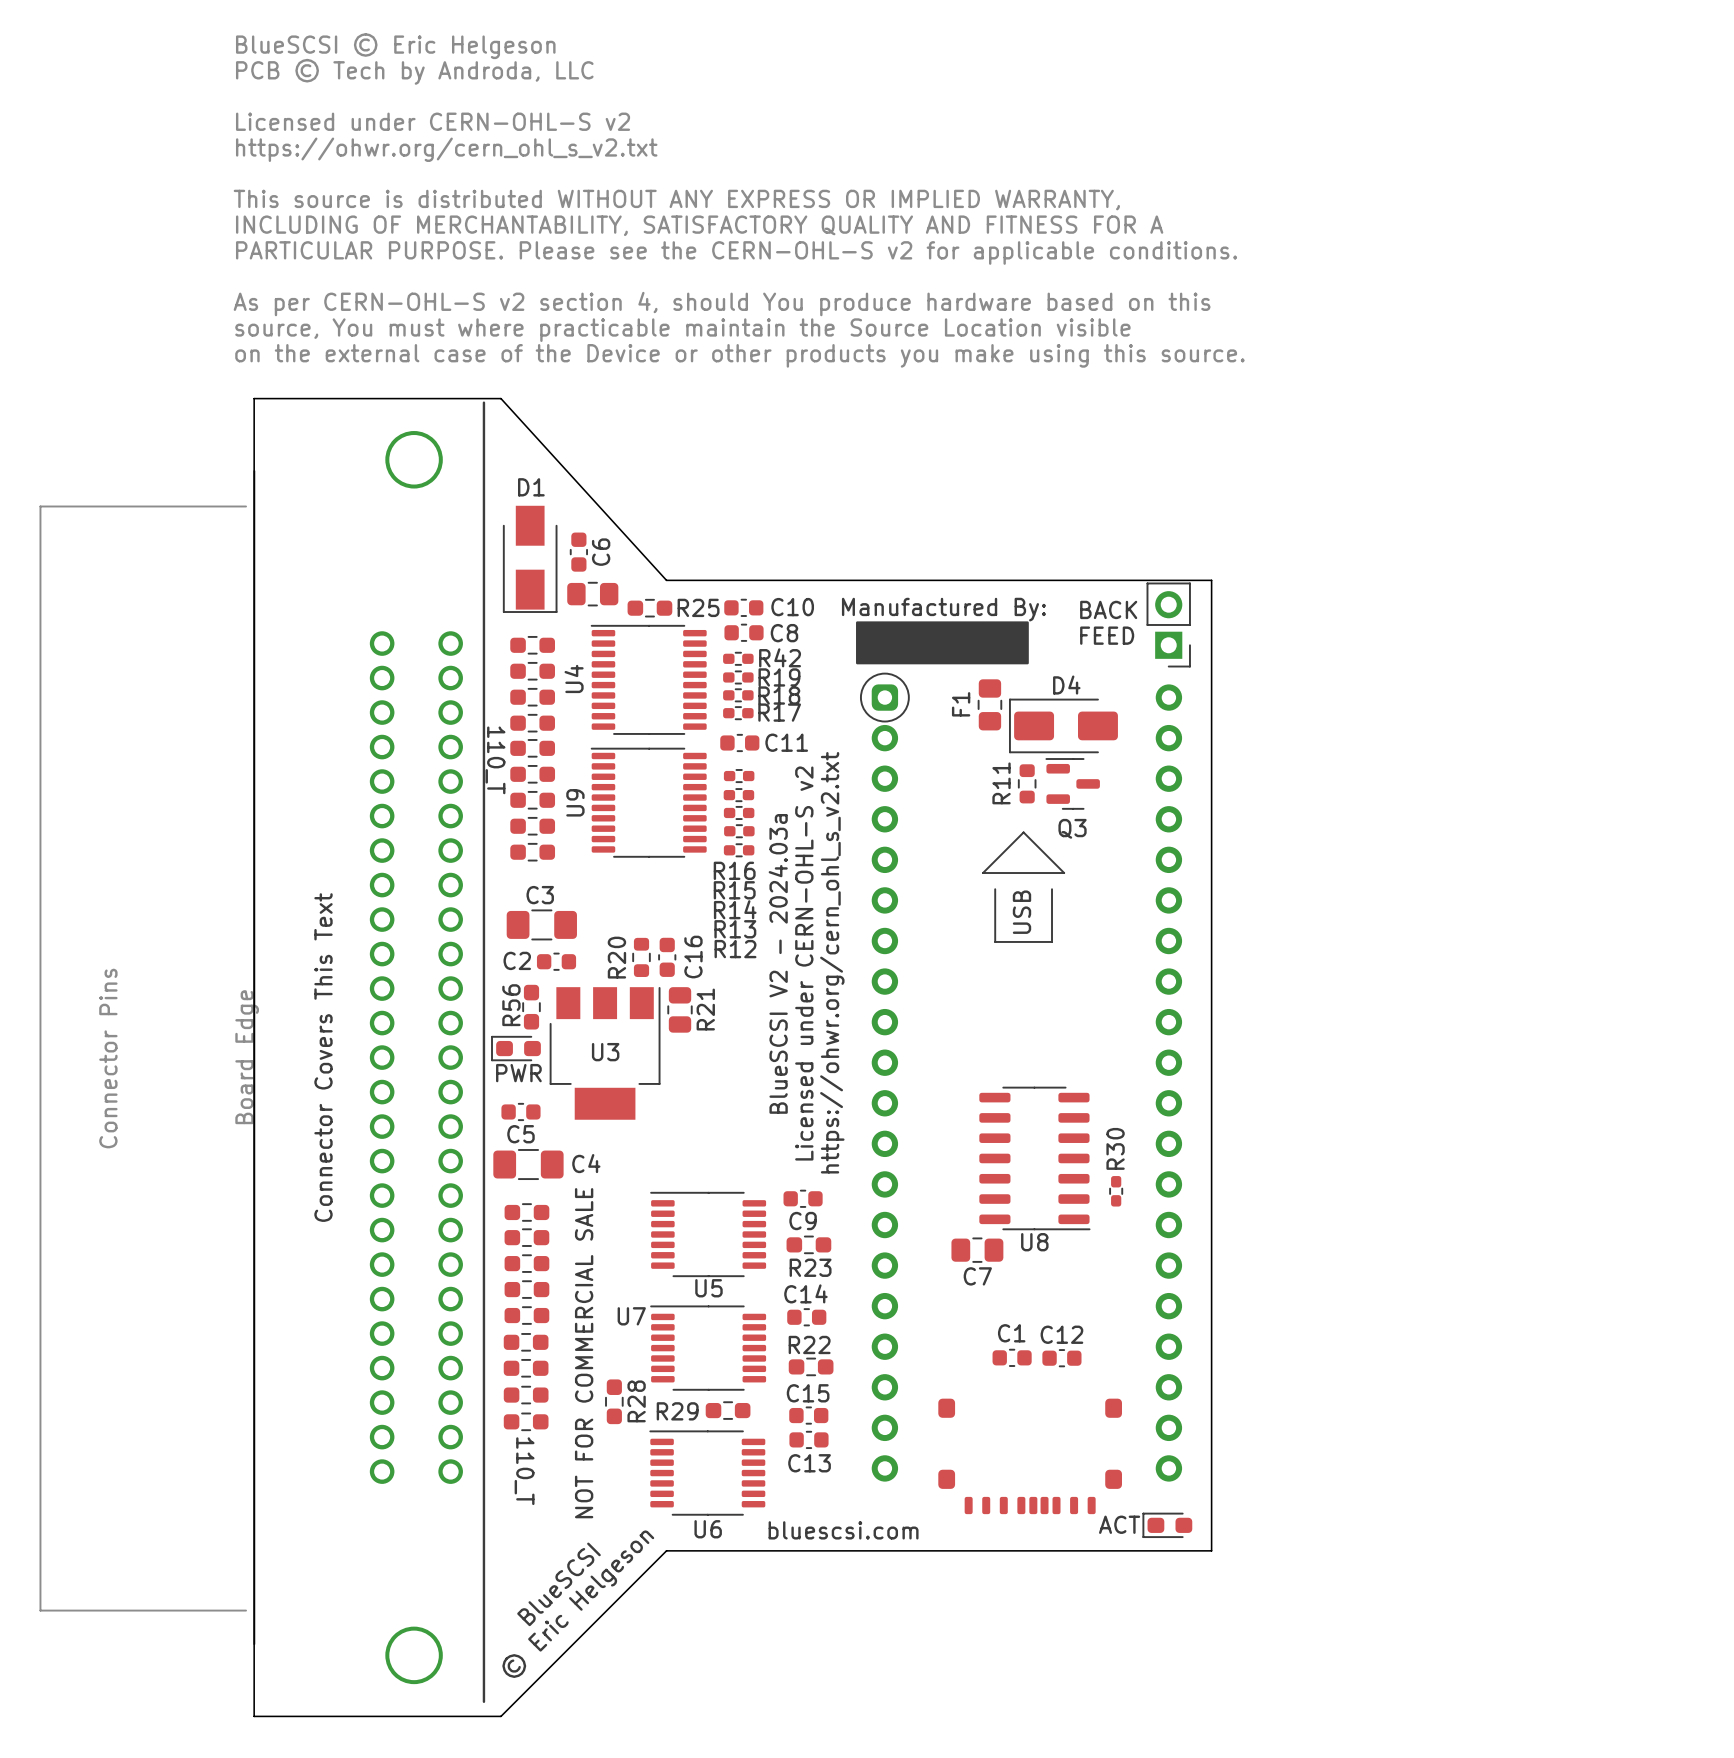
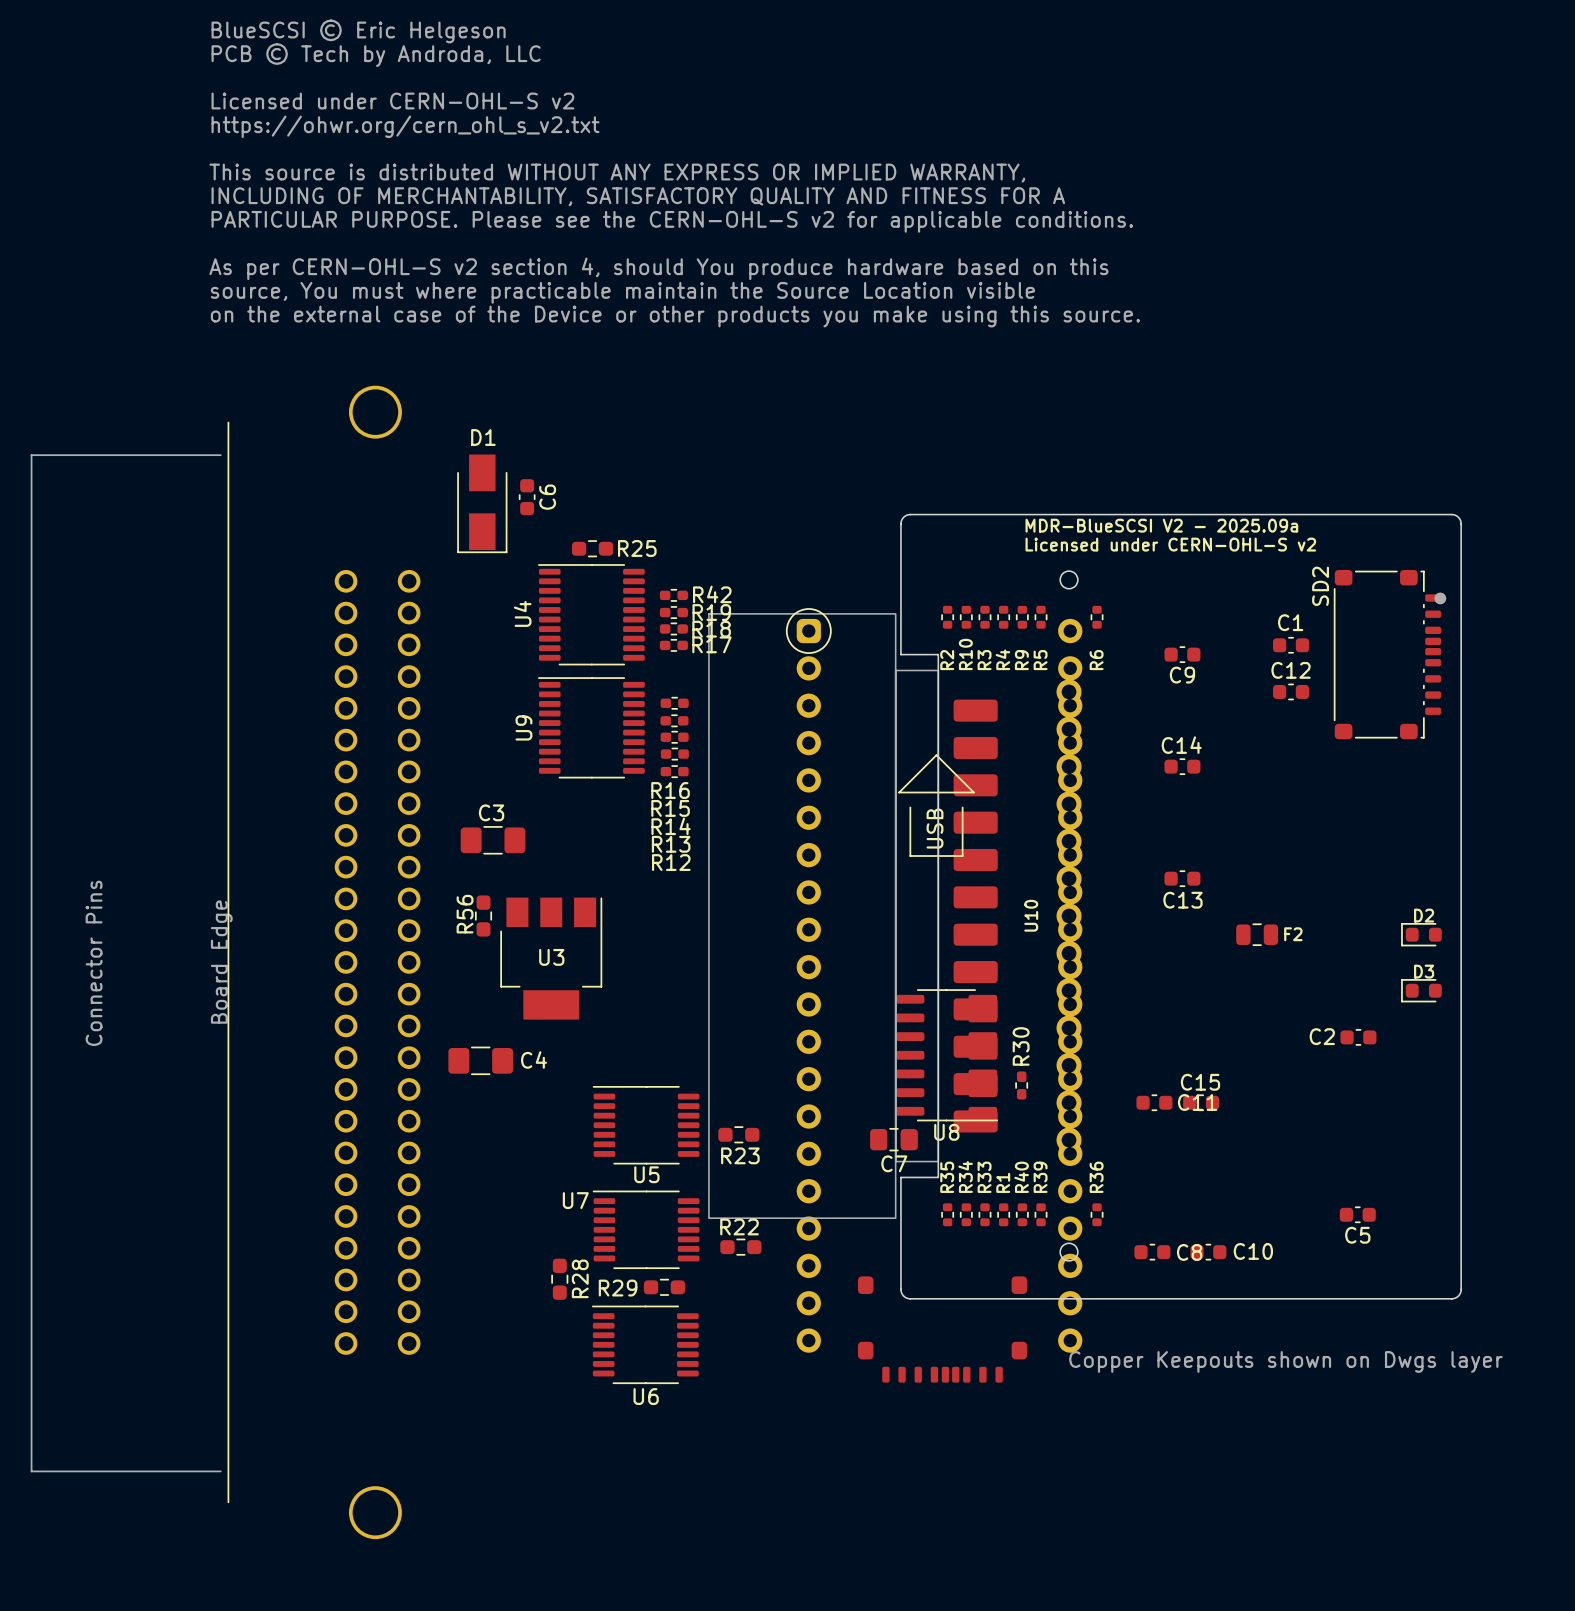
board edge: (254, 398) (254, 1716) (500, 1716) (666, 1550) (1211, 1550) (1211, 580) (666, 580) (500, 398) (254, 398) -> none
line: (483, 402) (483, 1701) -> none
board edge: none -> (910, 514) (1451, 514) (1459, 518) (1461, 1289) (1456, 1297) (910, 1298) (902, 1294) (900, 1177) (938, 1177) (938, 654) (900, 654) (901, 522) (904, 516) (910, 514)
text: none -> MDR-BlueSCSI V2 - 2025.09a (1161, 525)
part: (592, 594) -> none
text: none -> Licensed under CERN-OHL-S v2 (1170, 544)
C10 position: (743, 607) -> (1208, 1252)
text: Manufactured By: (943, 609) -> none
text: BACK (1108, 609) -> none
drawing: [856, 621, 1029, 665] -> none
part: (1168, 624) -> none
round board edge: none -> [1059, 570, 1079, 590]
C8 position: (744, 632) -> (1152, 1252)
text: FEED (1107, 635) -> none
part: (532, 645) -> none
part: (532, 671) -> none
R2: none -> (947, 617)
R10: none -> (966, 617)
R3: none -> (984, 617)
R4: none -> (1003, 617)
R9: none -> (1022, 617)
R5: none -> (1041, 617)
R6: none -> (1097, 617)
part: (532, 697) -> none
F1: (989, 704) -> none
part: (532, 723) -> none
SD2: none -> (1389, 654)
D4: (1063, 725) -> none
C11 position: (739, 742) -> (1154, 1102)
part: (532, 748) -> none
text: 110_T (495, 760) -> none
part: (532, 774) -> none
R11: (1027, 783) -> none
Q3: (1072, 783) -> none
part: (532, 800) -> none
part: (532, 826) -> none
part: (532, 852) -> none
R20: (641, 957) -> none
C16: (667, 957) -> none
C2 position: (556, 961) -> (1358, 1037)
text: https://ohwr.org/cern_ohl_s_v2.txt (832, 962) -> none
text: BlueSCSI V2 - 2024.03a (778, 963) -> none
text: Licensed under CERN-OHL-S v2 (804, 963) -> none
U10: none -> (894, 916)
R21: (680, 1009) -> none
F2: none -> (1257, 934)
D2: none -> (1421, 934)
part: (515, 1048) -> none
text: Connector Covers This Text (323, 1057) -> none
text: PWR (518, 1073) -> none
D3: none -> (1421, 990)
C5 position: (520, 1111) -> (1357, 1214)
C9 position: (803, 1198) -> (1182, 654)
part: (526, 1212) -> none
part: (526, 1237) -> none
part: (526, 1263) -> none
part: (526, 1289) -> none
part: (526, 1315) -> none
C14 position: (806, 1317) -> (1182, 766)
R35: none -> (947, 1214)
R34: none -> (966, 1214)
R33: none -> (984, 1214)
R1: none -> (1003, 1214)
R40: none -> (1022, 1214)
R39: none -> (1041, 1214)
R36: none -> (1097, 1214)
part: (526, 1342) -> none
text: NOT FOR COMMERCIAL SALE (584, 1353) -> none
C1 position: (1012, 1357) -> (1291, 645)
C12 position: (1061, 1358) -> (1291, 691)
round board edge: none -> [1059, 1242, 1079, 1262]
part: (526, 1368) -> none
part: (526, 1395) -> none
C15 position: (808, 1415) -> (1201, 1102)
part: (526, 1421) -> none
C13 position: (808, 1439) -> (1182, 878)
text: 110_T (524, 1471) -> none
part: none -> (1285, 1361)
text: ACT (1119, 1524) -> none
part: (1167, 1525) -> none
text: bluescsi.com (843, 1530) -> none
text: BlueSCSI (558, 1584) -> none
text: © Eric Helgeson (578, 1604) -> none

